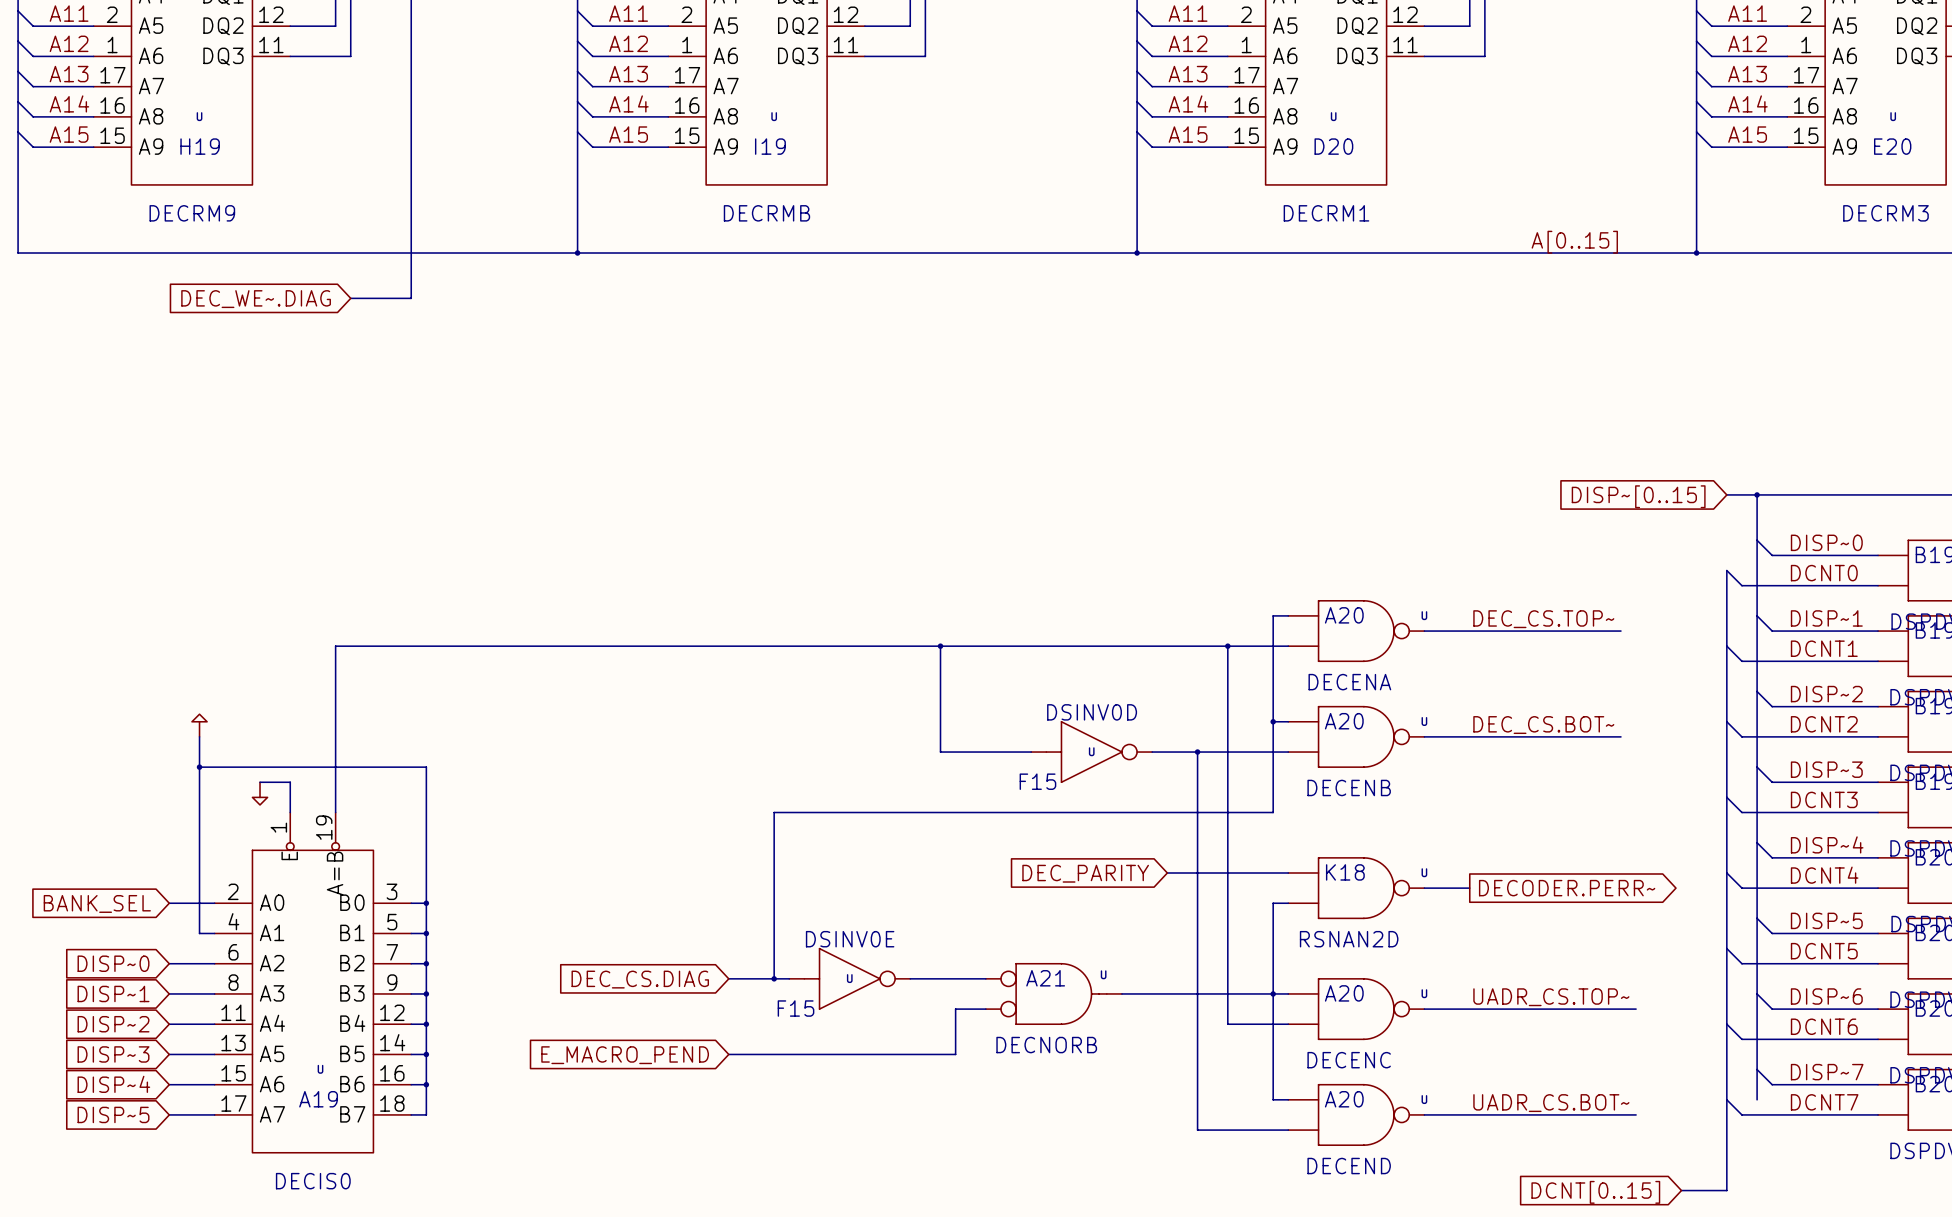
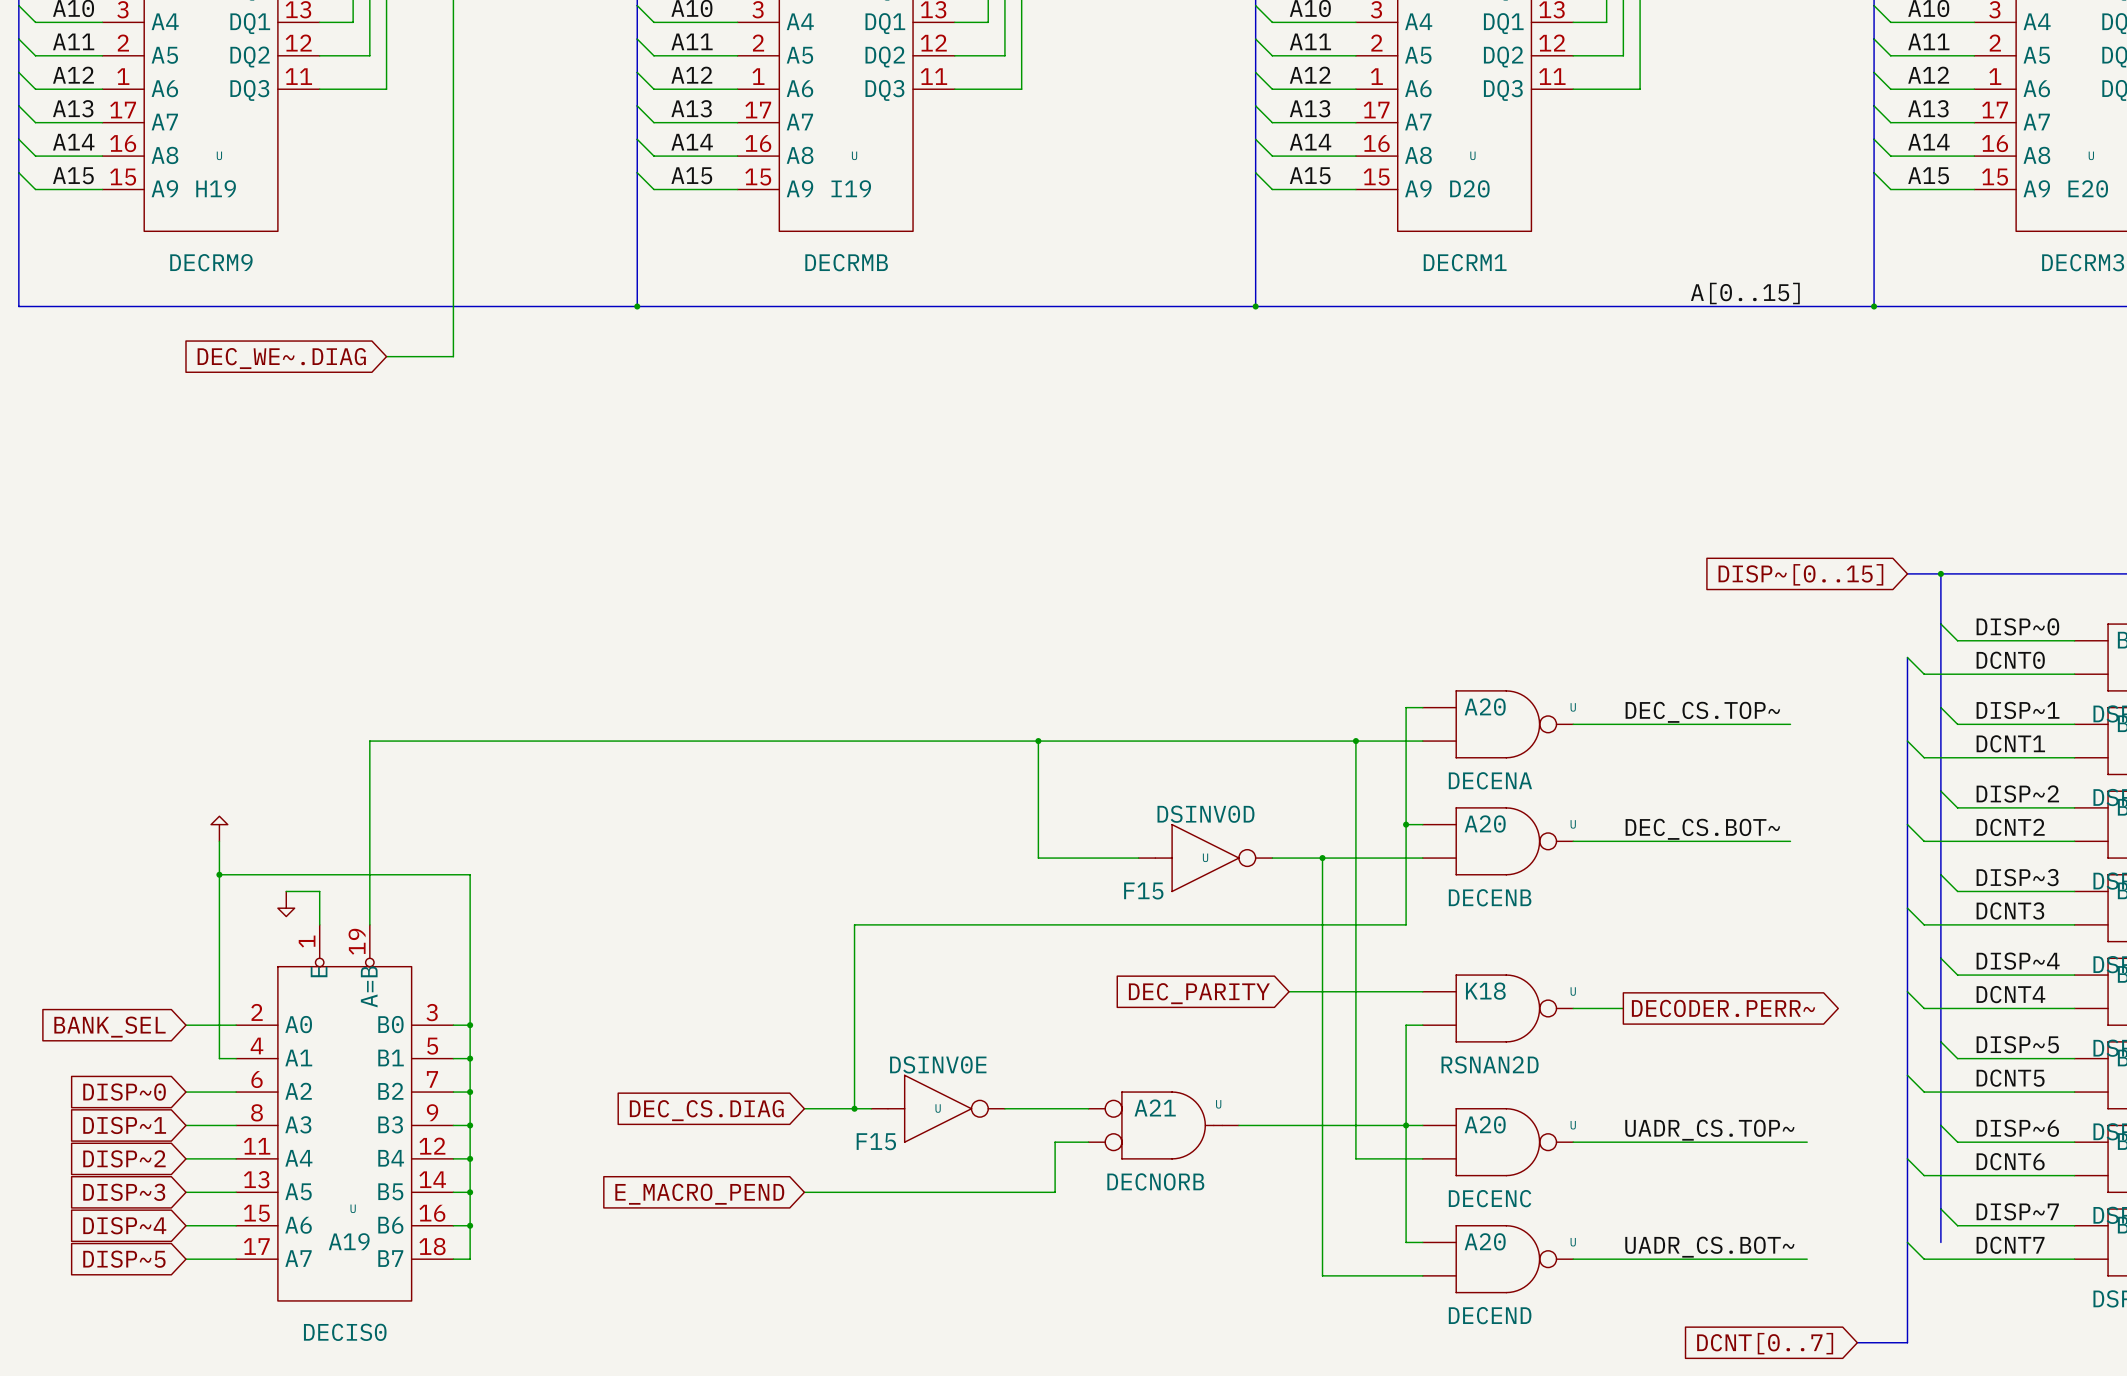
global label: DCNT[0..15] (1595, 1192) -> DCNT[0..7] (1765, 1343)

